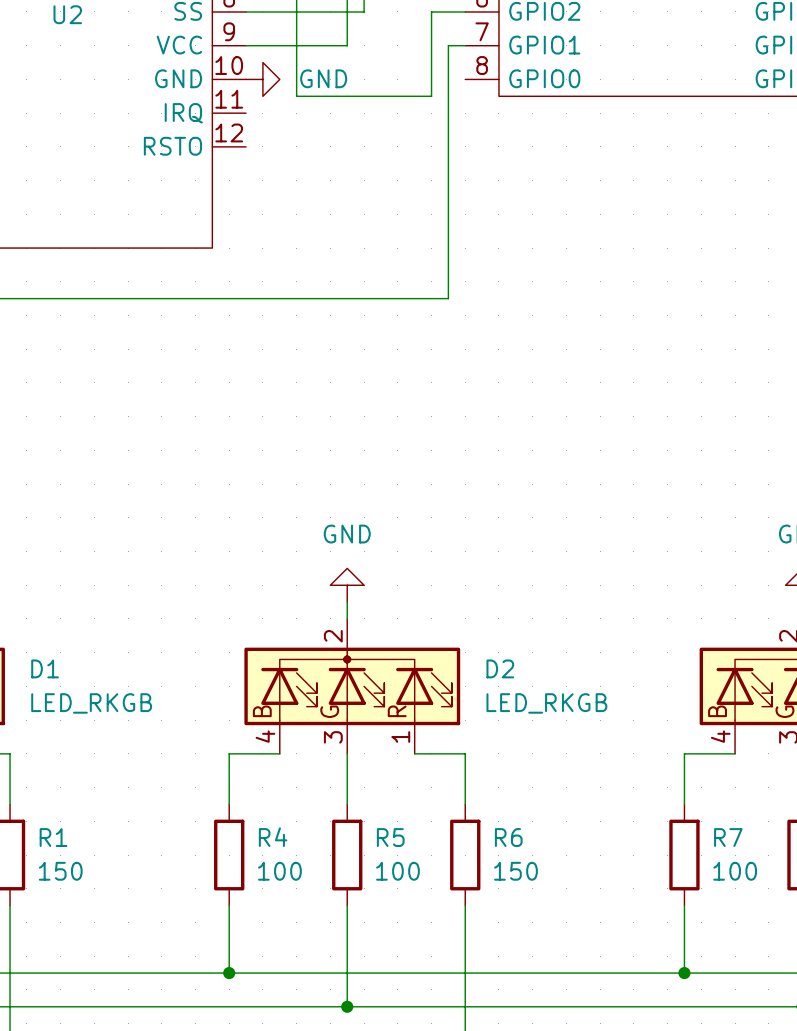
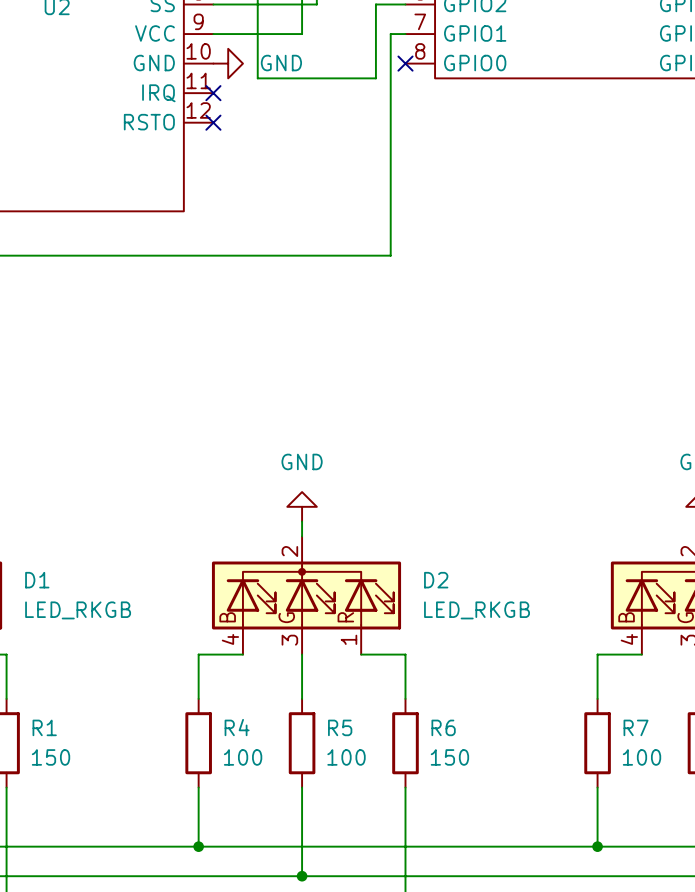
no-connect mark: none -> (405, 63)
no-connect mark: none -> (213, 93)
no-connect mark: none -> (213, 122)

